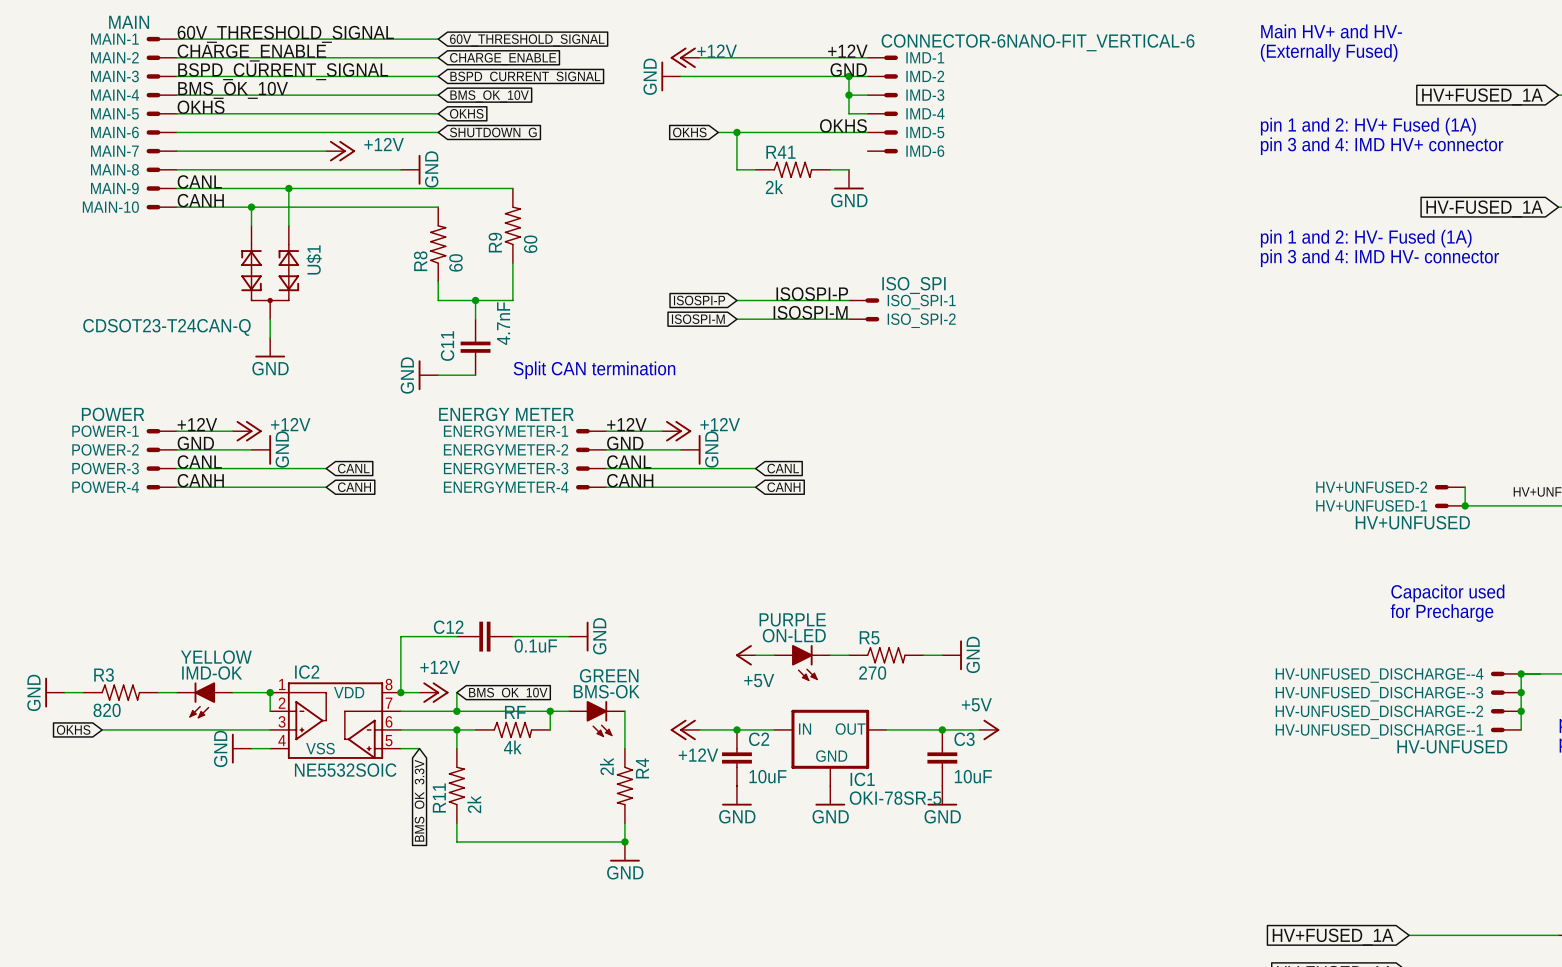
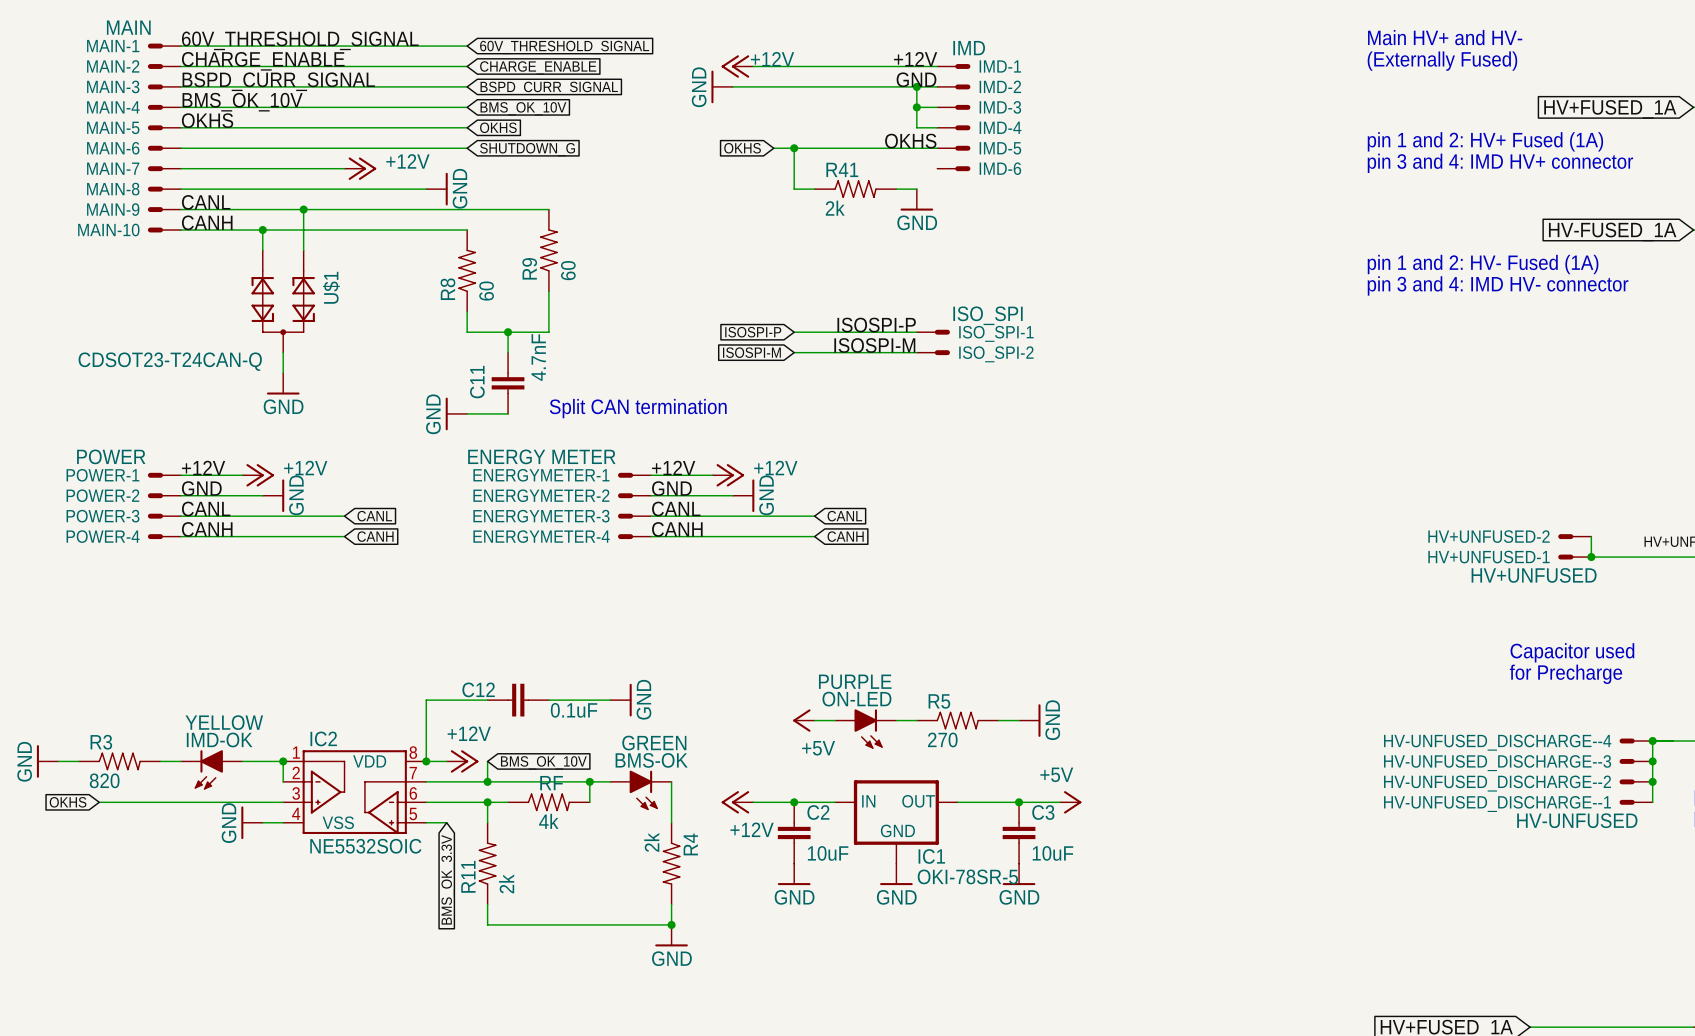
IMD-1 value: CONNECTOR-6NANO-FIT_VERTICAL-6 (1038, 42) -> IMD (969, 48)
label: BSPD_CURRENT_SIGNAL (283, 71) -> BSPD_CURR_SIGNAL (278, 81)
global label: BSPD_CURRENT_SIGNAL (525, 77) -> BSPD_CURR_SIGNAL (549, 88)

